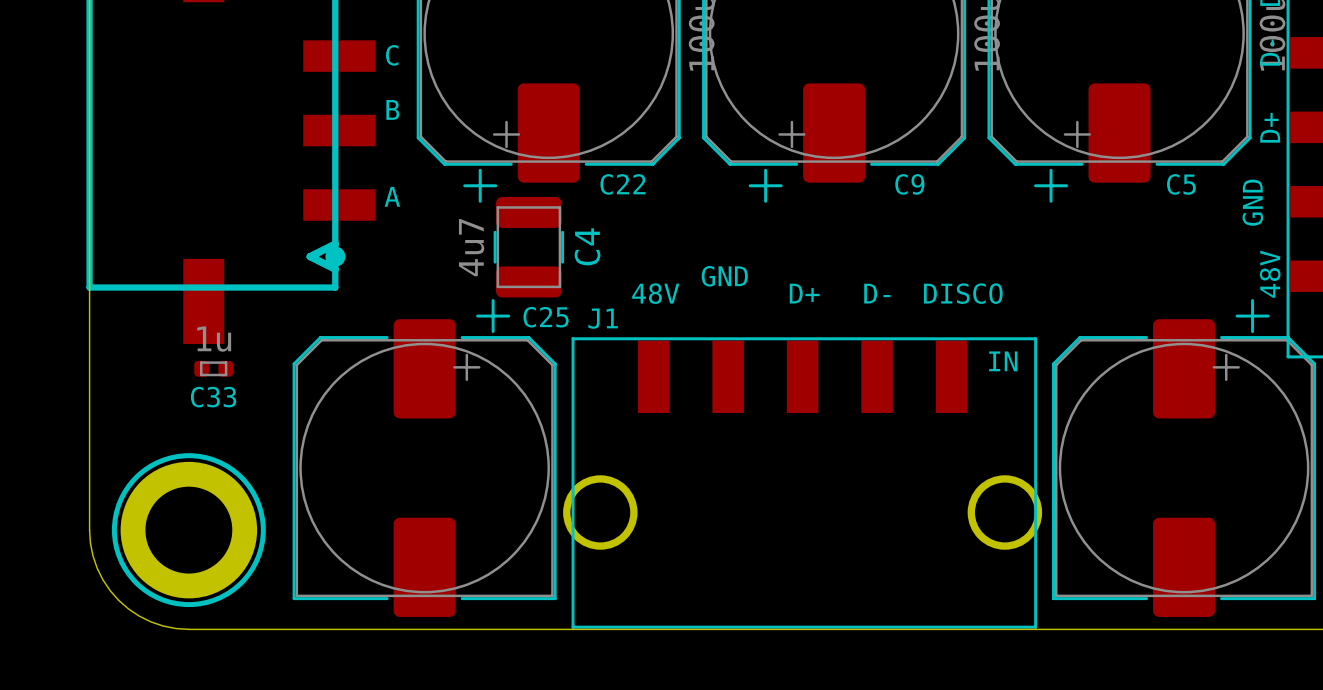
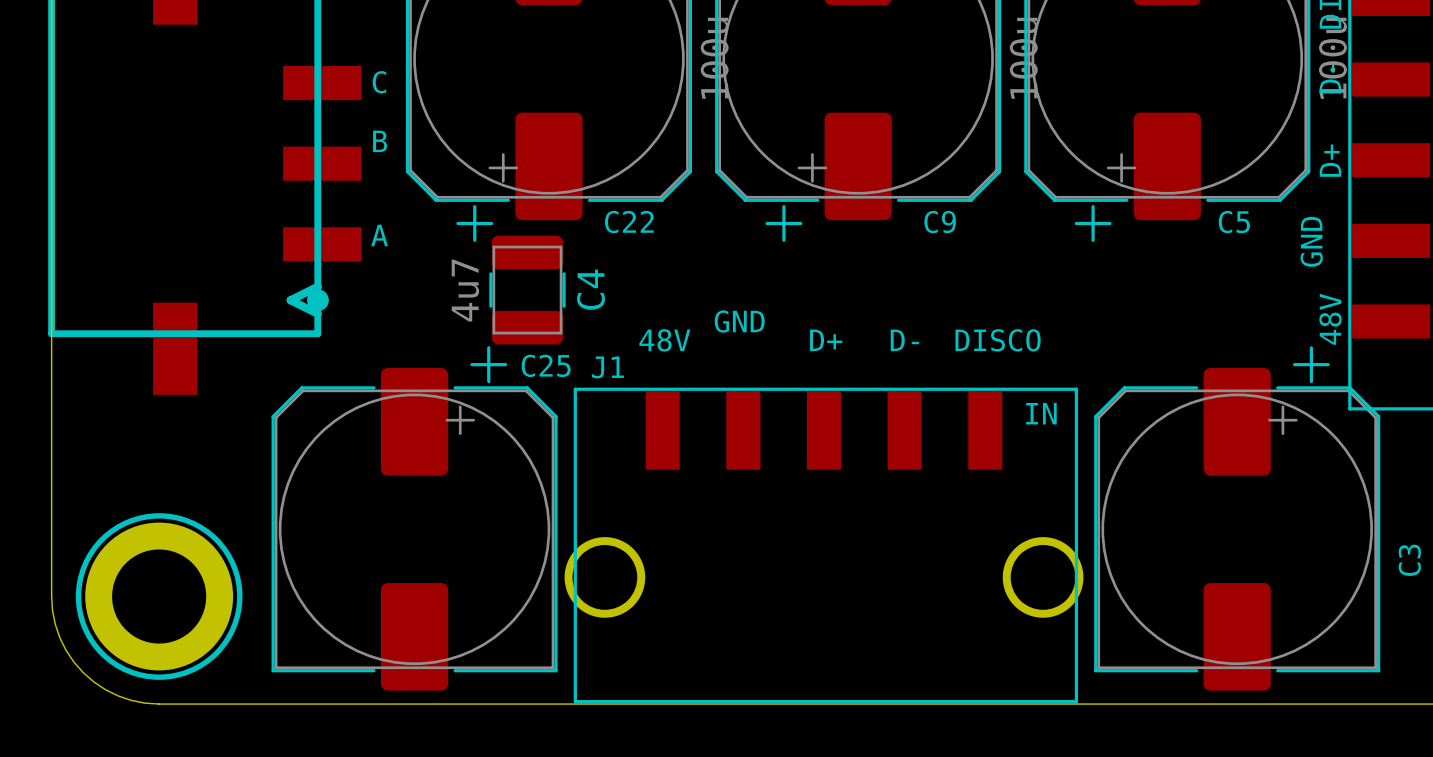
C33: 1u (213, 368) -> none

